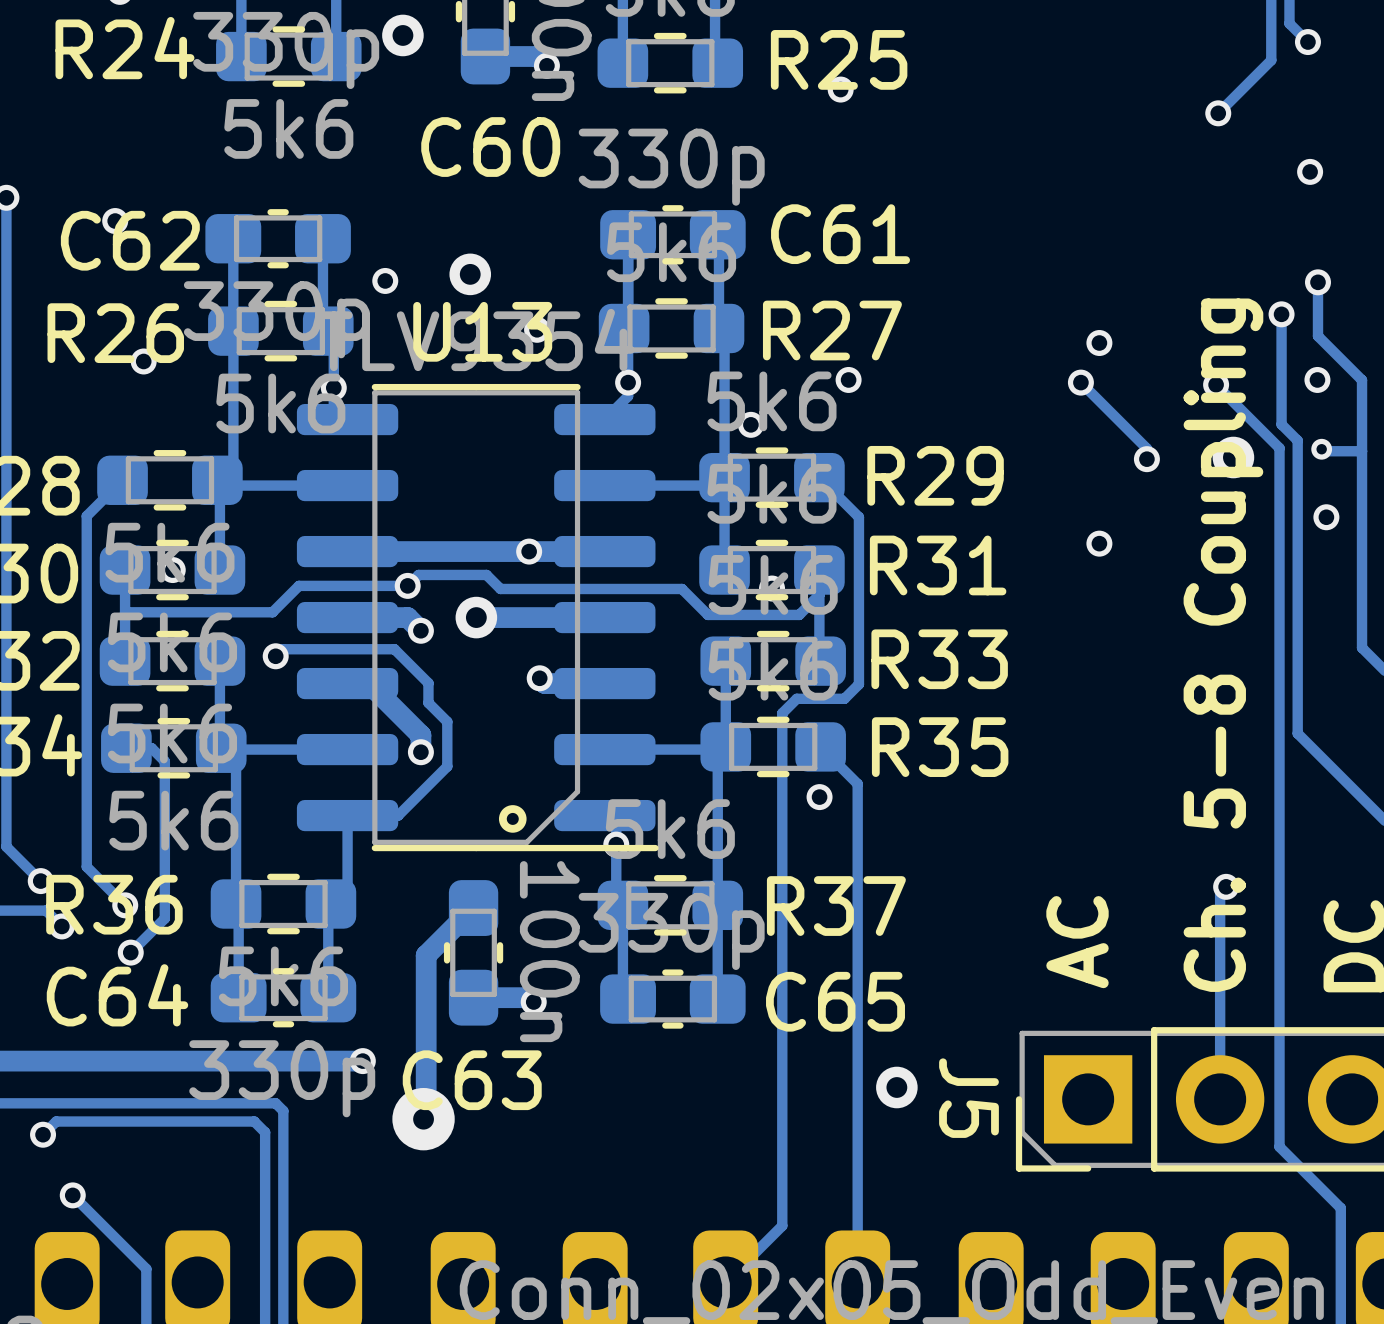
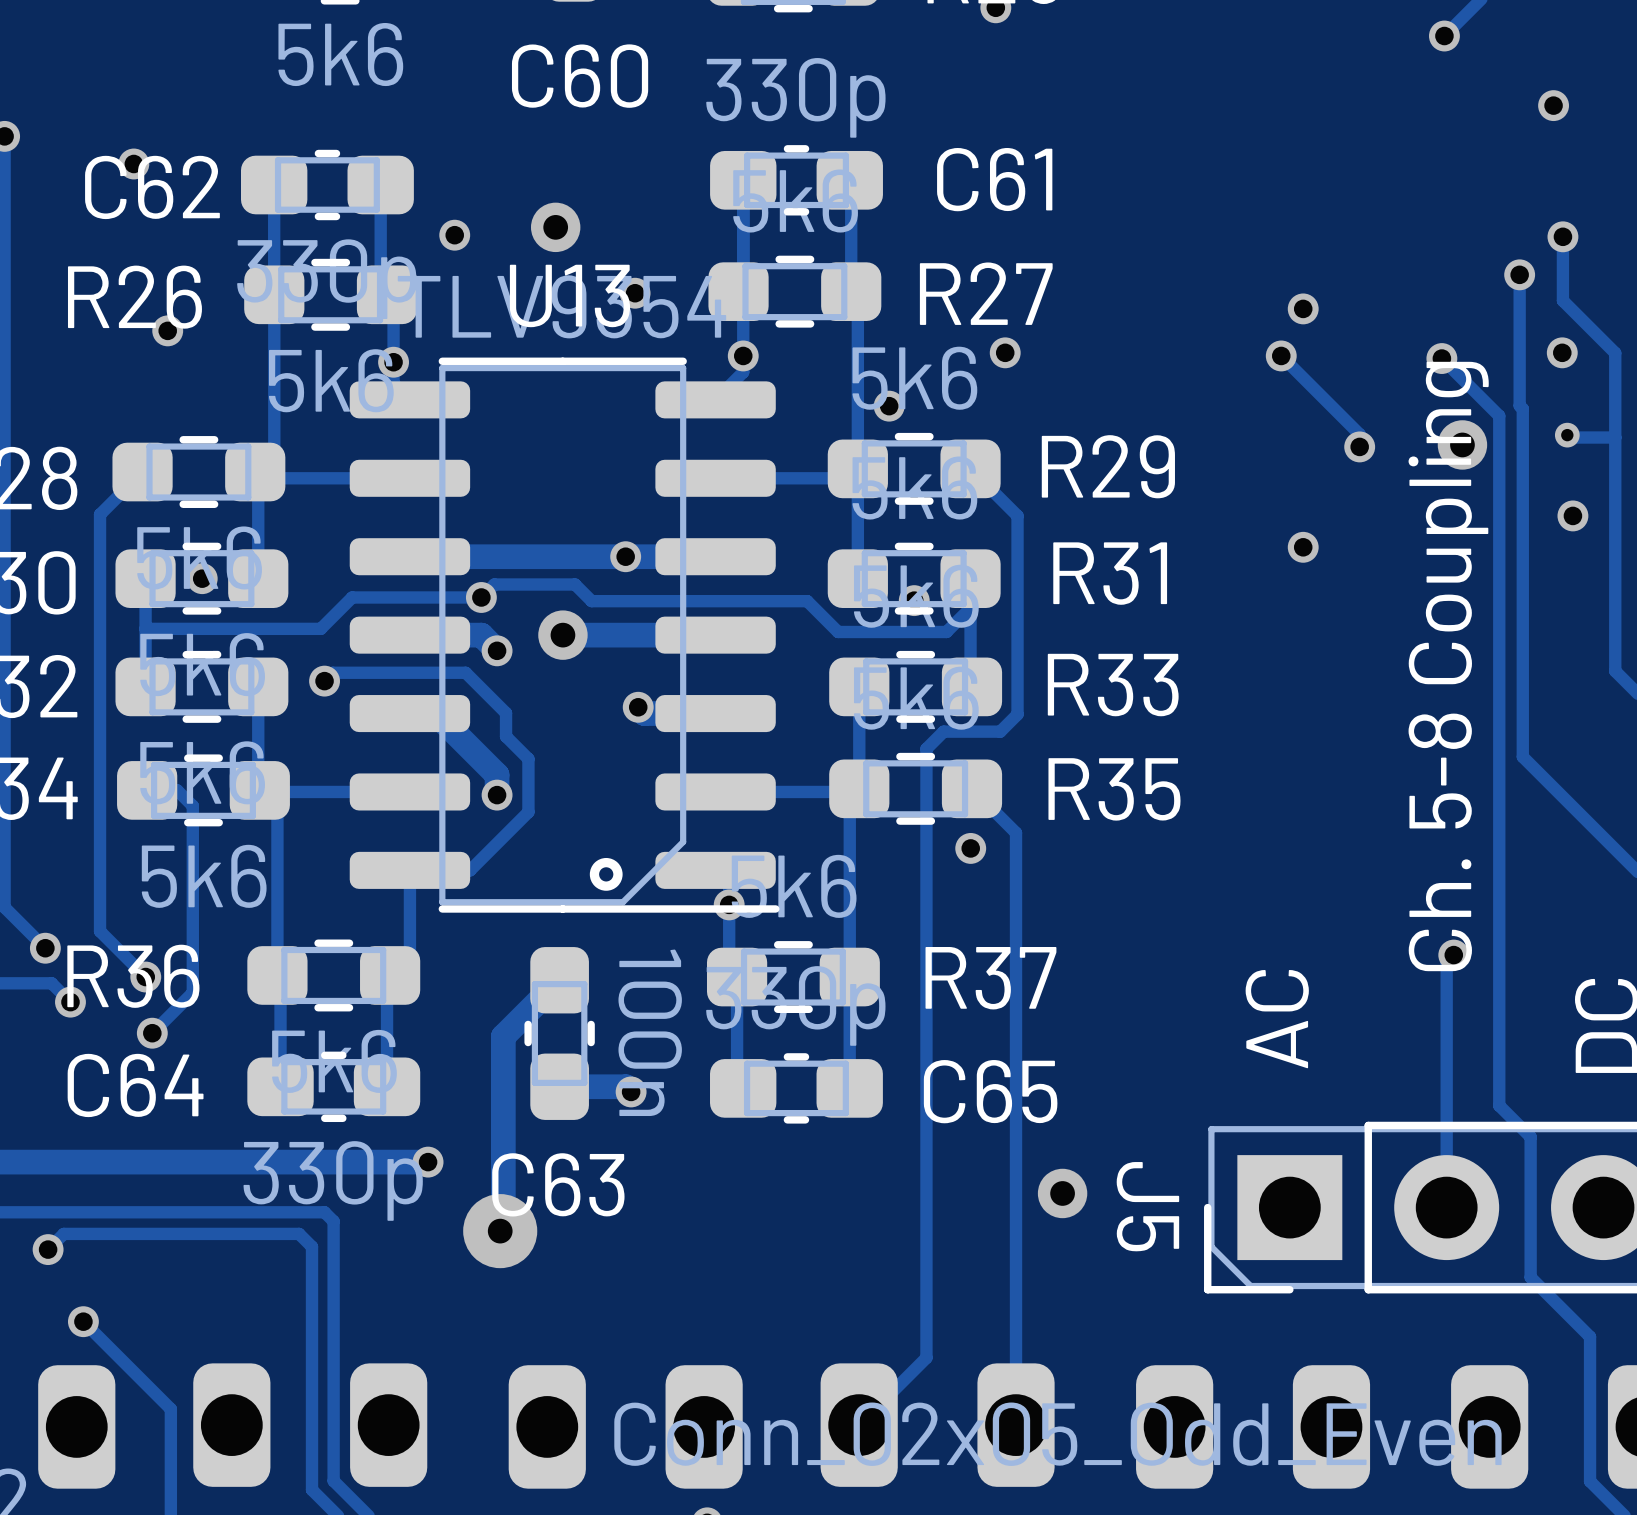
track: (1284, 427) (1297, 440) (1297, 733) -> (1522, 408) (1522, 756) (1538, 772)
track: (1264, 433) (1279, 448) (1279, 1146) (1290, 1158) -> (1499, 415) (1499, 1105) (1530, 1137) (1530, 1277)

